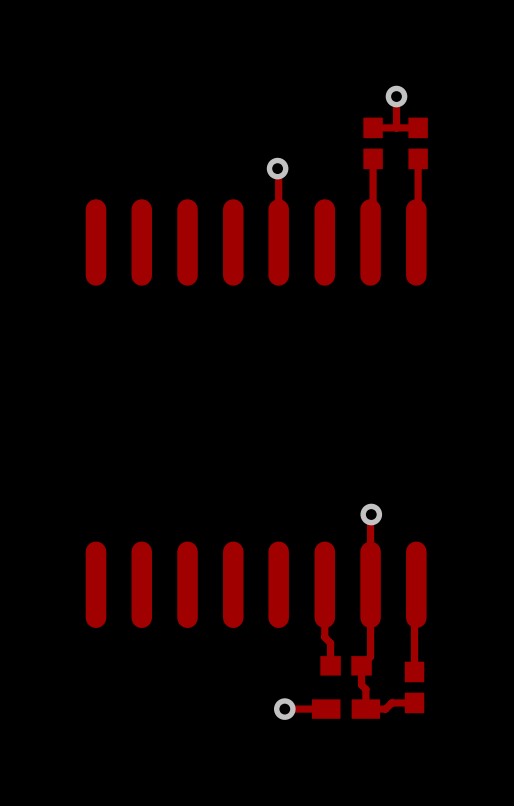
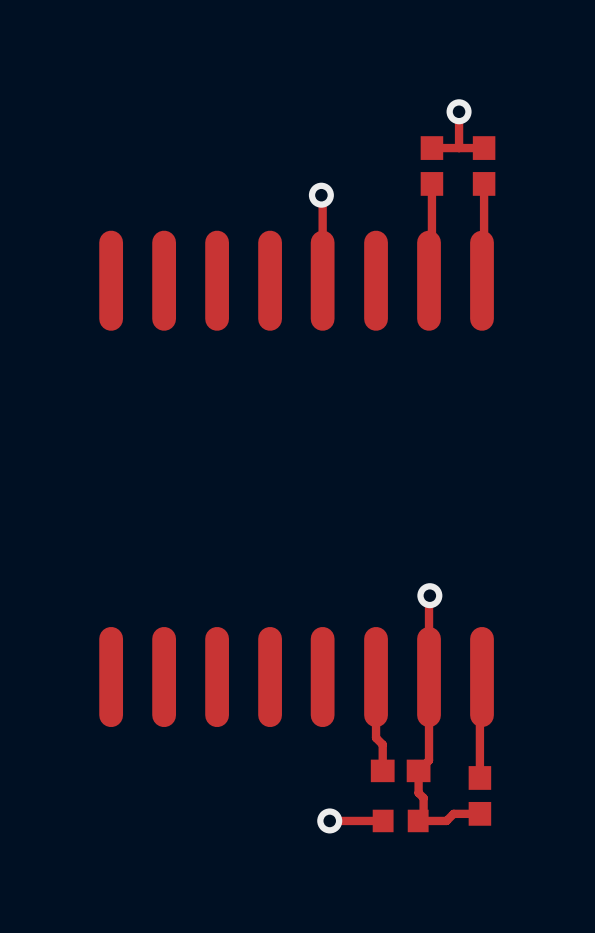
part footprint: [312, 699, 381, 719] -> [372, 809, 429, 833]

